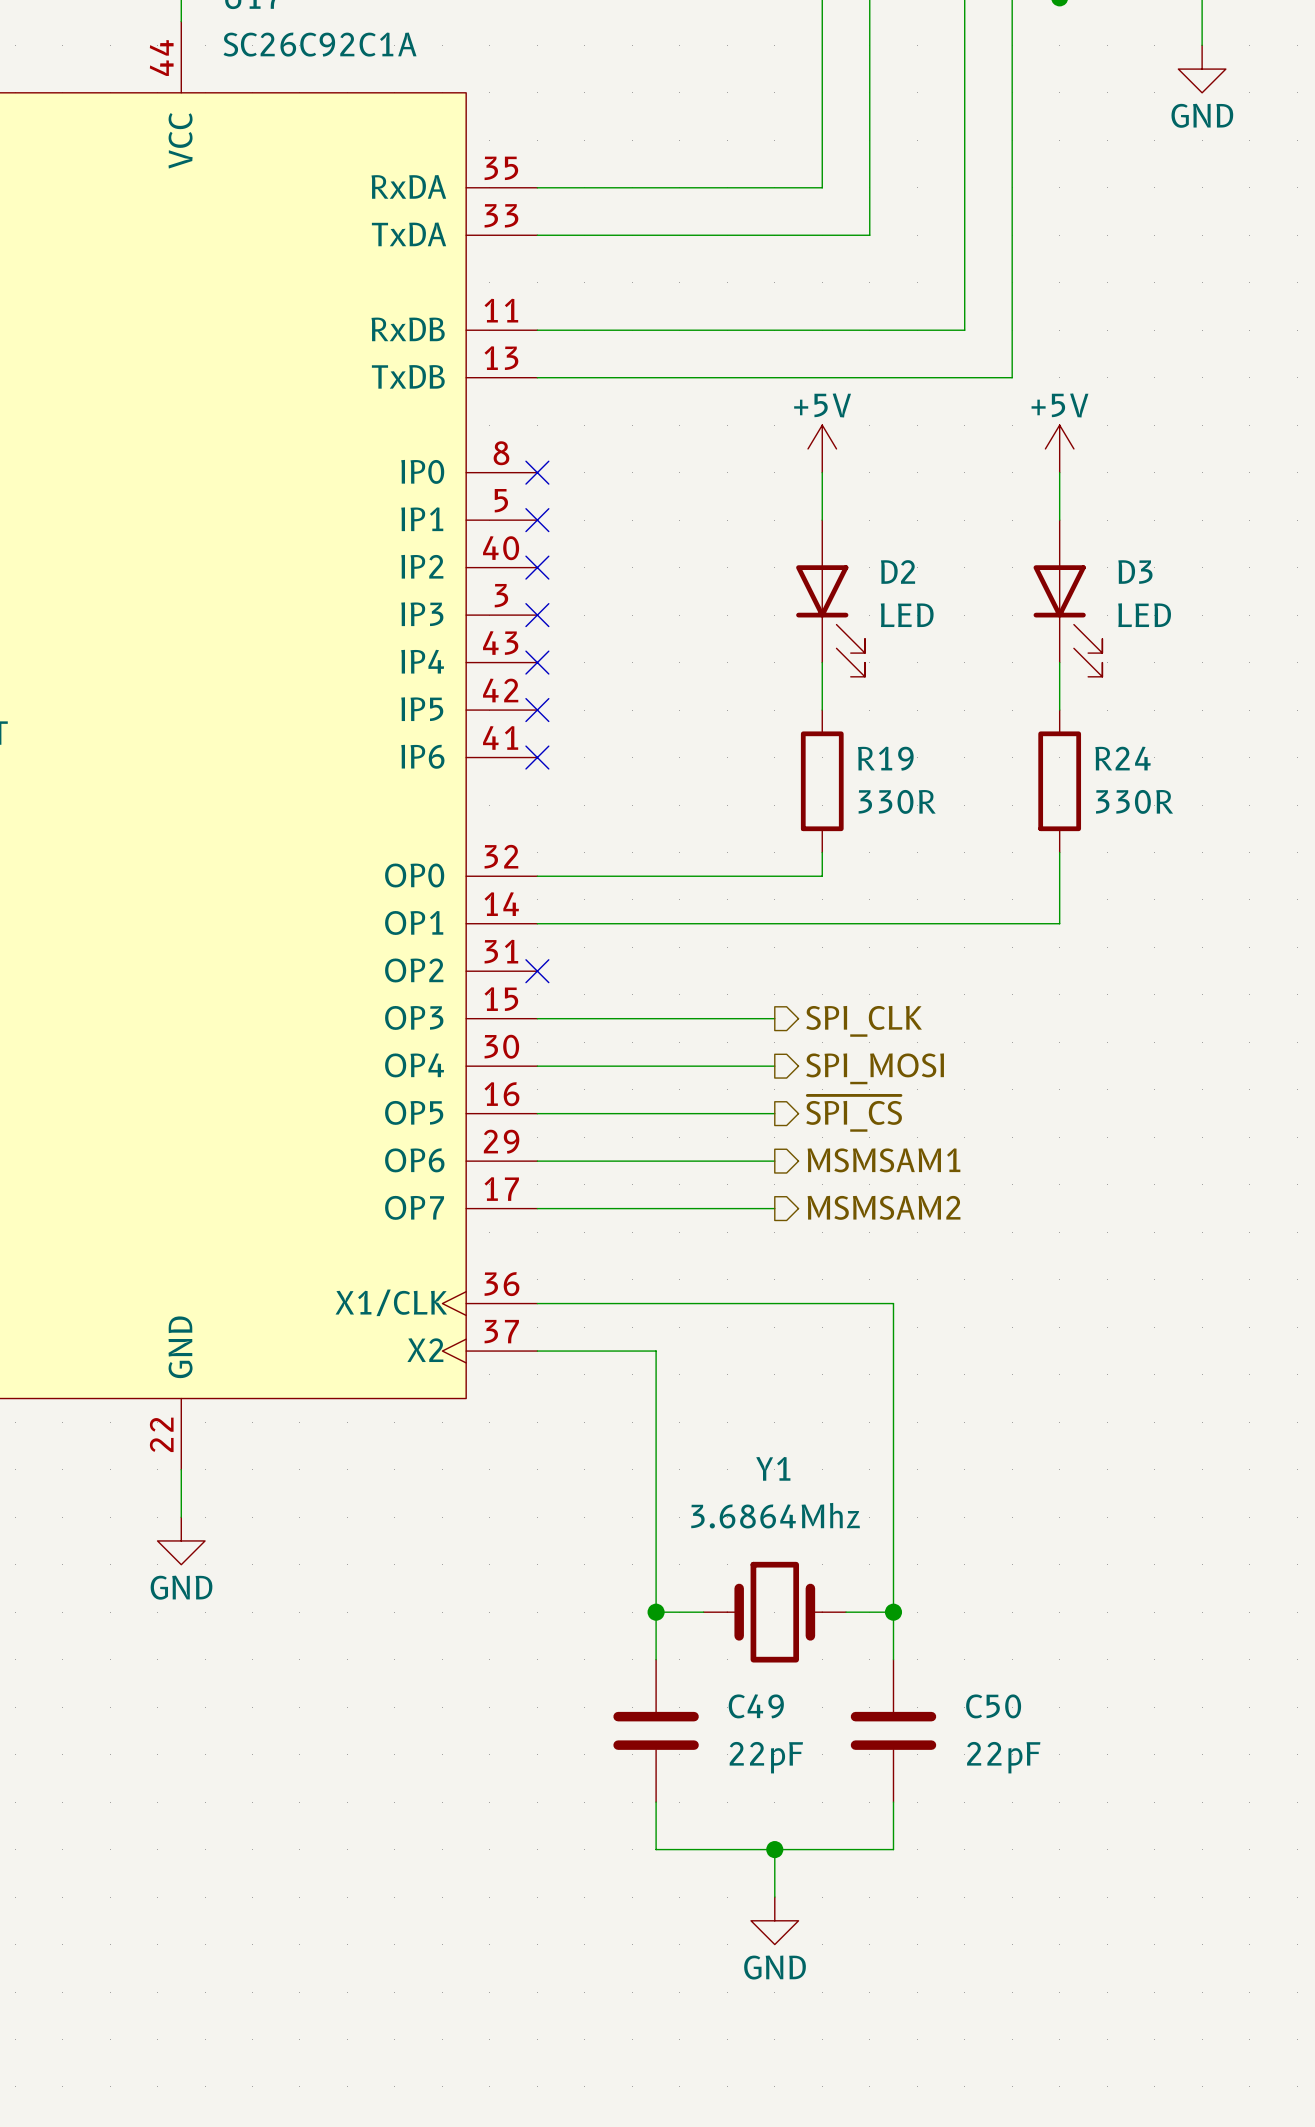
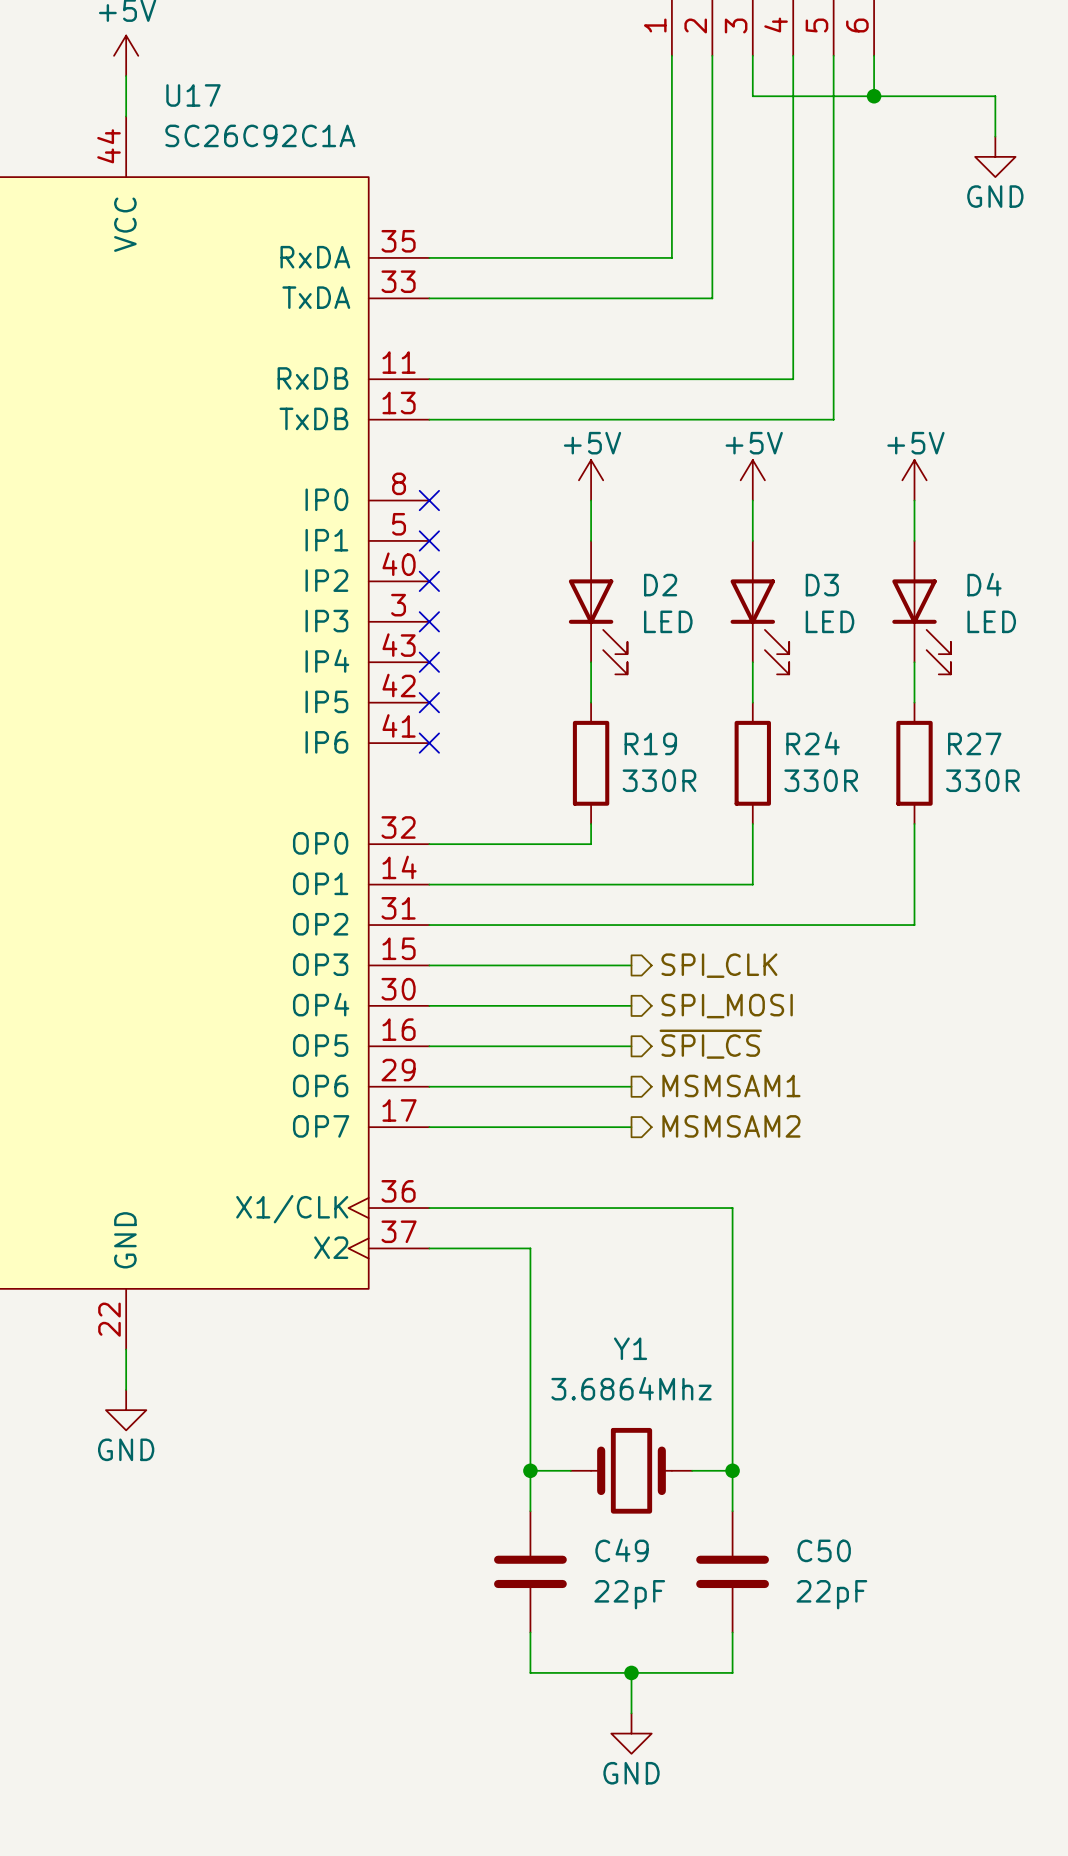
power symbol: none -> +5V (591, 480)
power symbol: +5V (822, 448) -> none
power symbol: none -> +5V (752, 480)
power symbol position: +5V (1059, 448) -> +5V (914, 480)
wire: (822, 472) (822, 520) -> (591, 500) (591, 540)
wire: none -> (752, 500) (752, 540)
wire: (1059, 472) (1059, 520) -> (914, 500) (914, 540)
D2 position: (830, 598) -> (598, 607)
D3 position: (1067, 598) -> (759, 607)
D4: none -> LED (921, 607)
wire: (822, 662) (822, 710) -> (591, 662) (591, 702)
wire: none -> (752, 662) (752, 702)
wire: (1059, 662) (1059, 710) -> (914, 662) (914, 702)
R19 position: (822, 781) -> (591, 763)
R24 position: (1059, 781) -> (752, 763)
R27: none -> 330R (914, 763)
wire: (822, 852) (822, 876) (727, 876) -> (591, 823) (591, 844)
wire: (1059, 852) (1059, 923) (917, 923) -> (752, 823) (752, 884)
wire: none -> (914, 823) (914, 925) (429, 925)
no-connect mark: (537, 971) -> none

